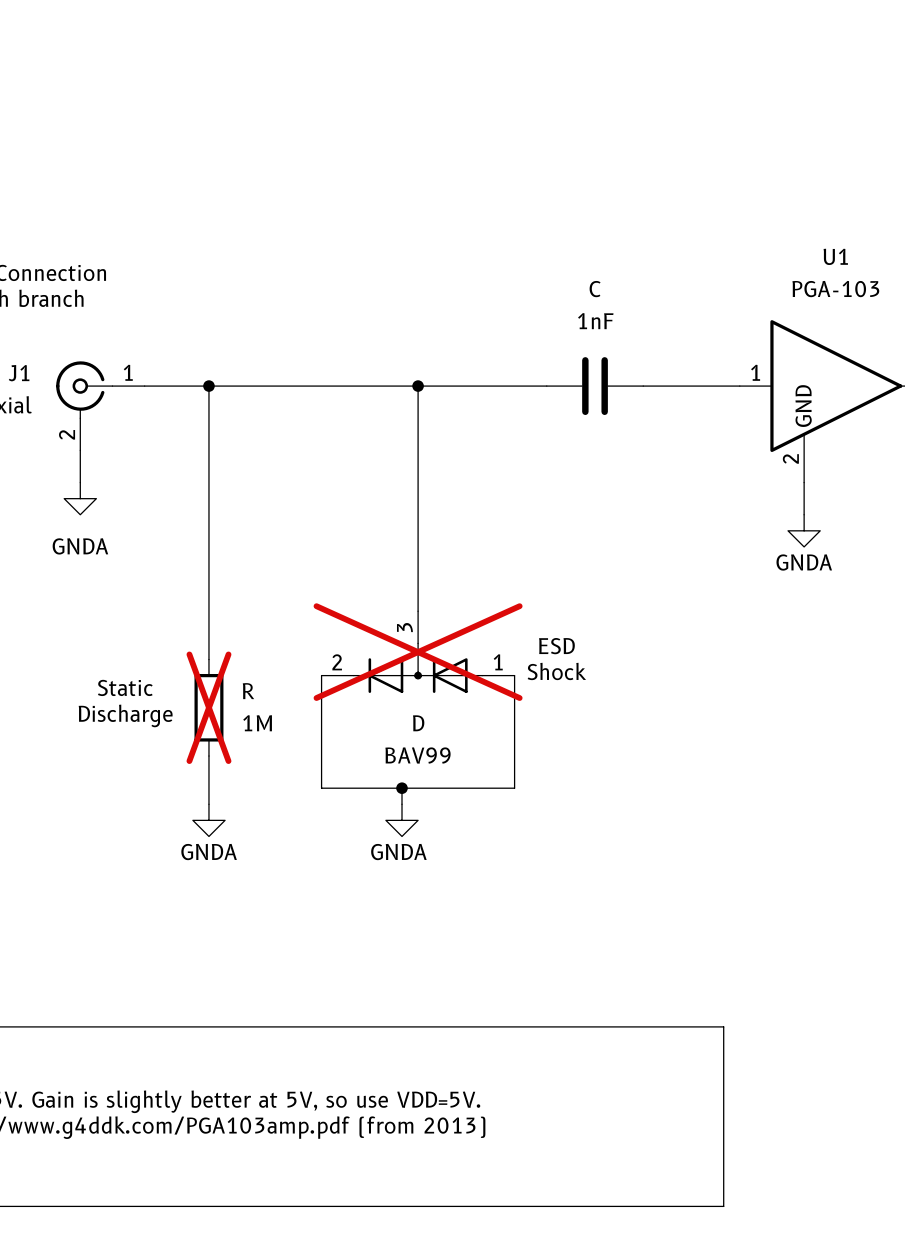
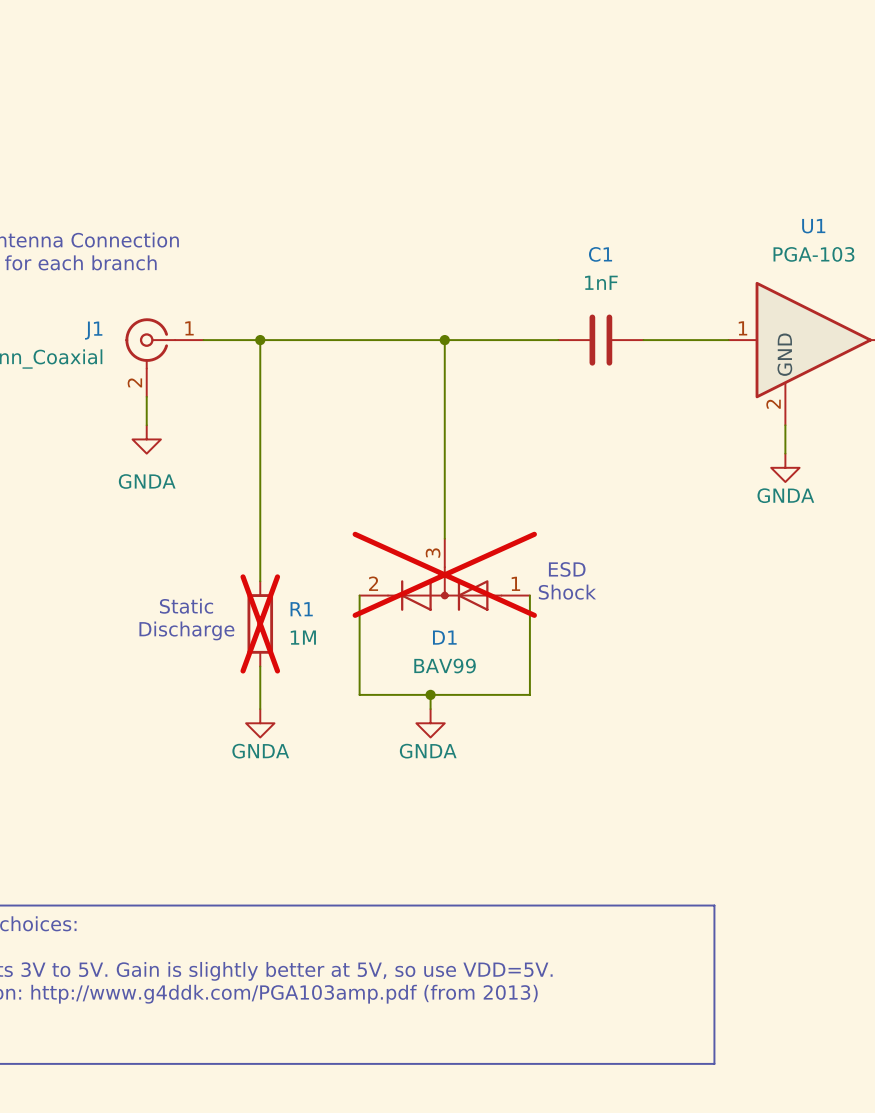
C name: C (595, 289) -> C1 (600, 254)
R name: R (248, 691) -> R1 (301, 609)
D name: D (418, 723) -> D1 (444, 637)

